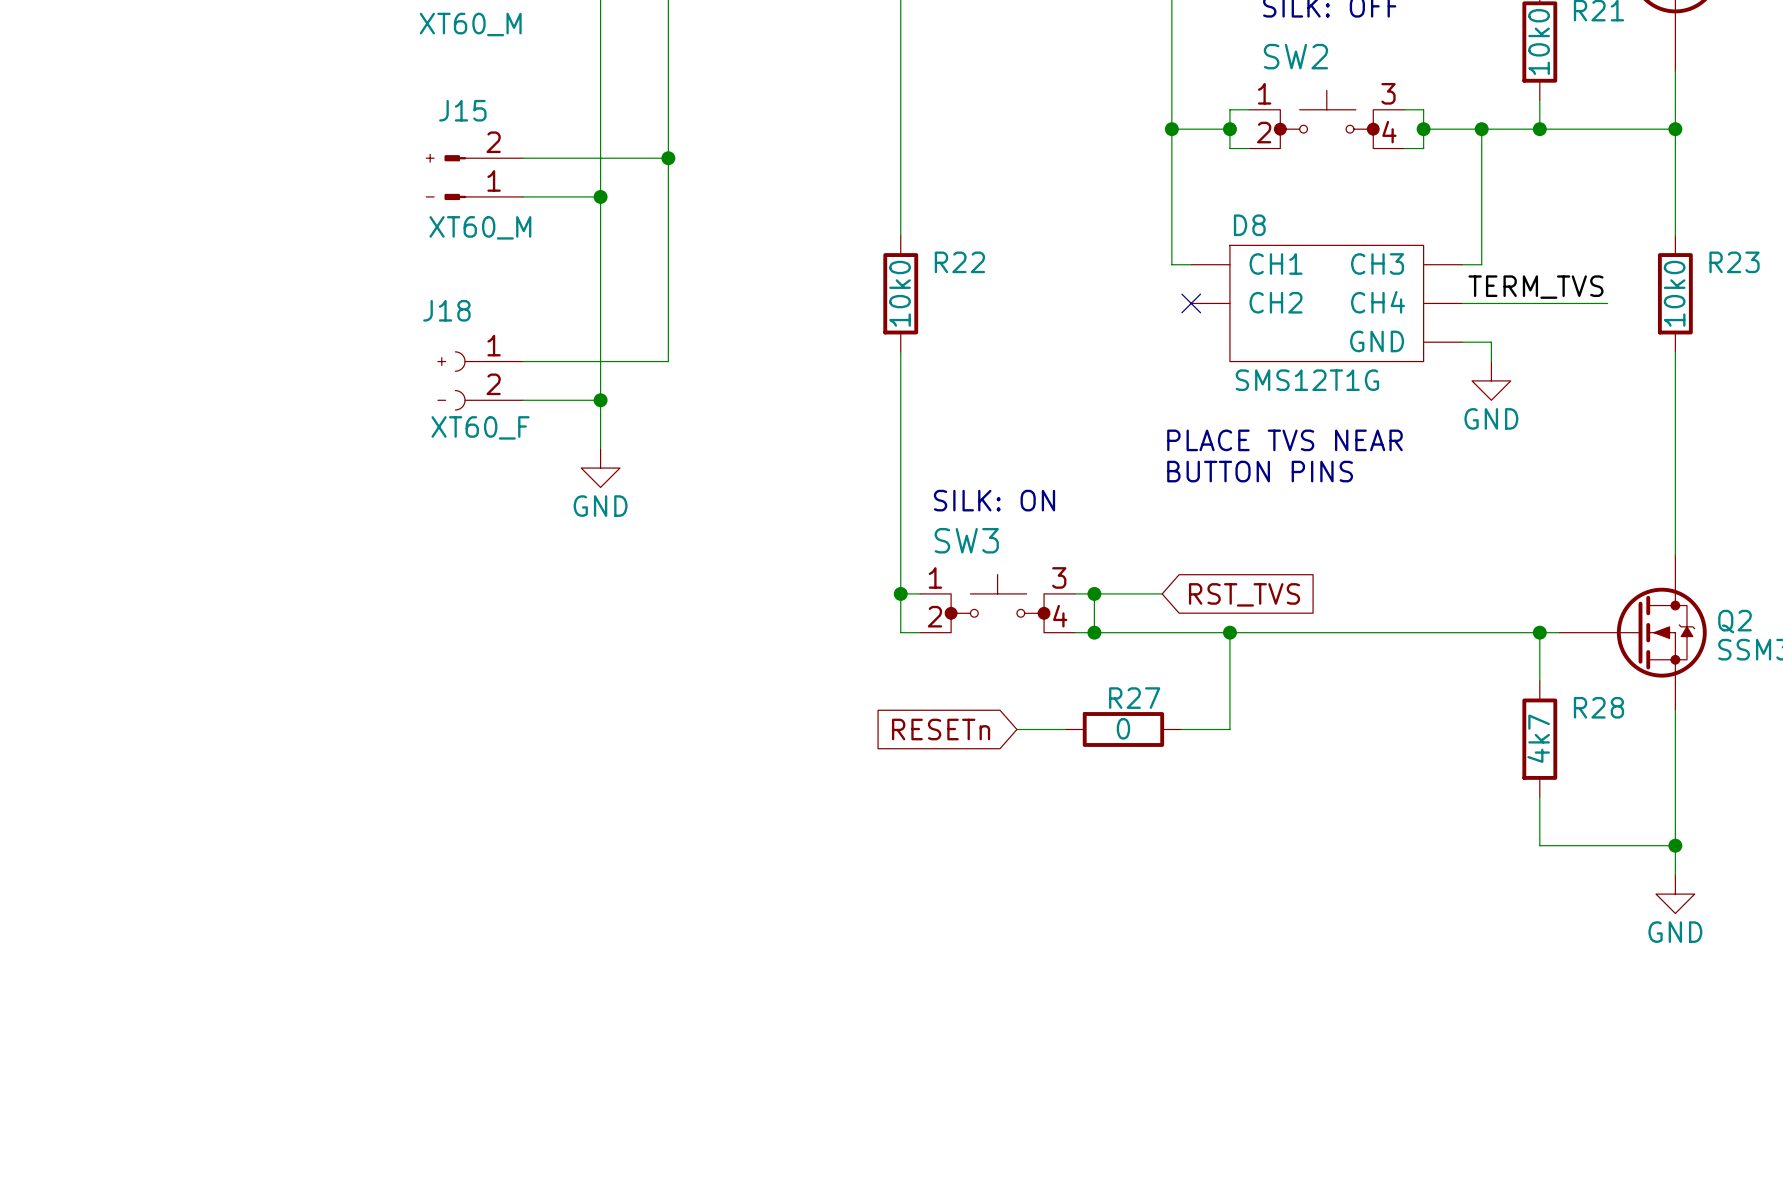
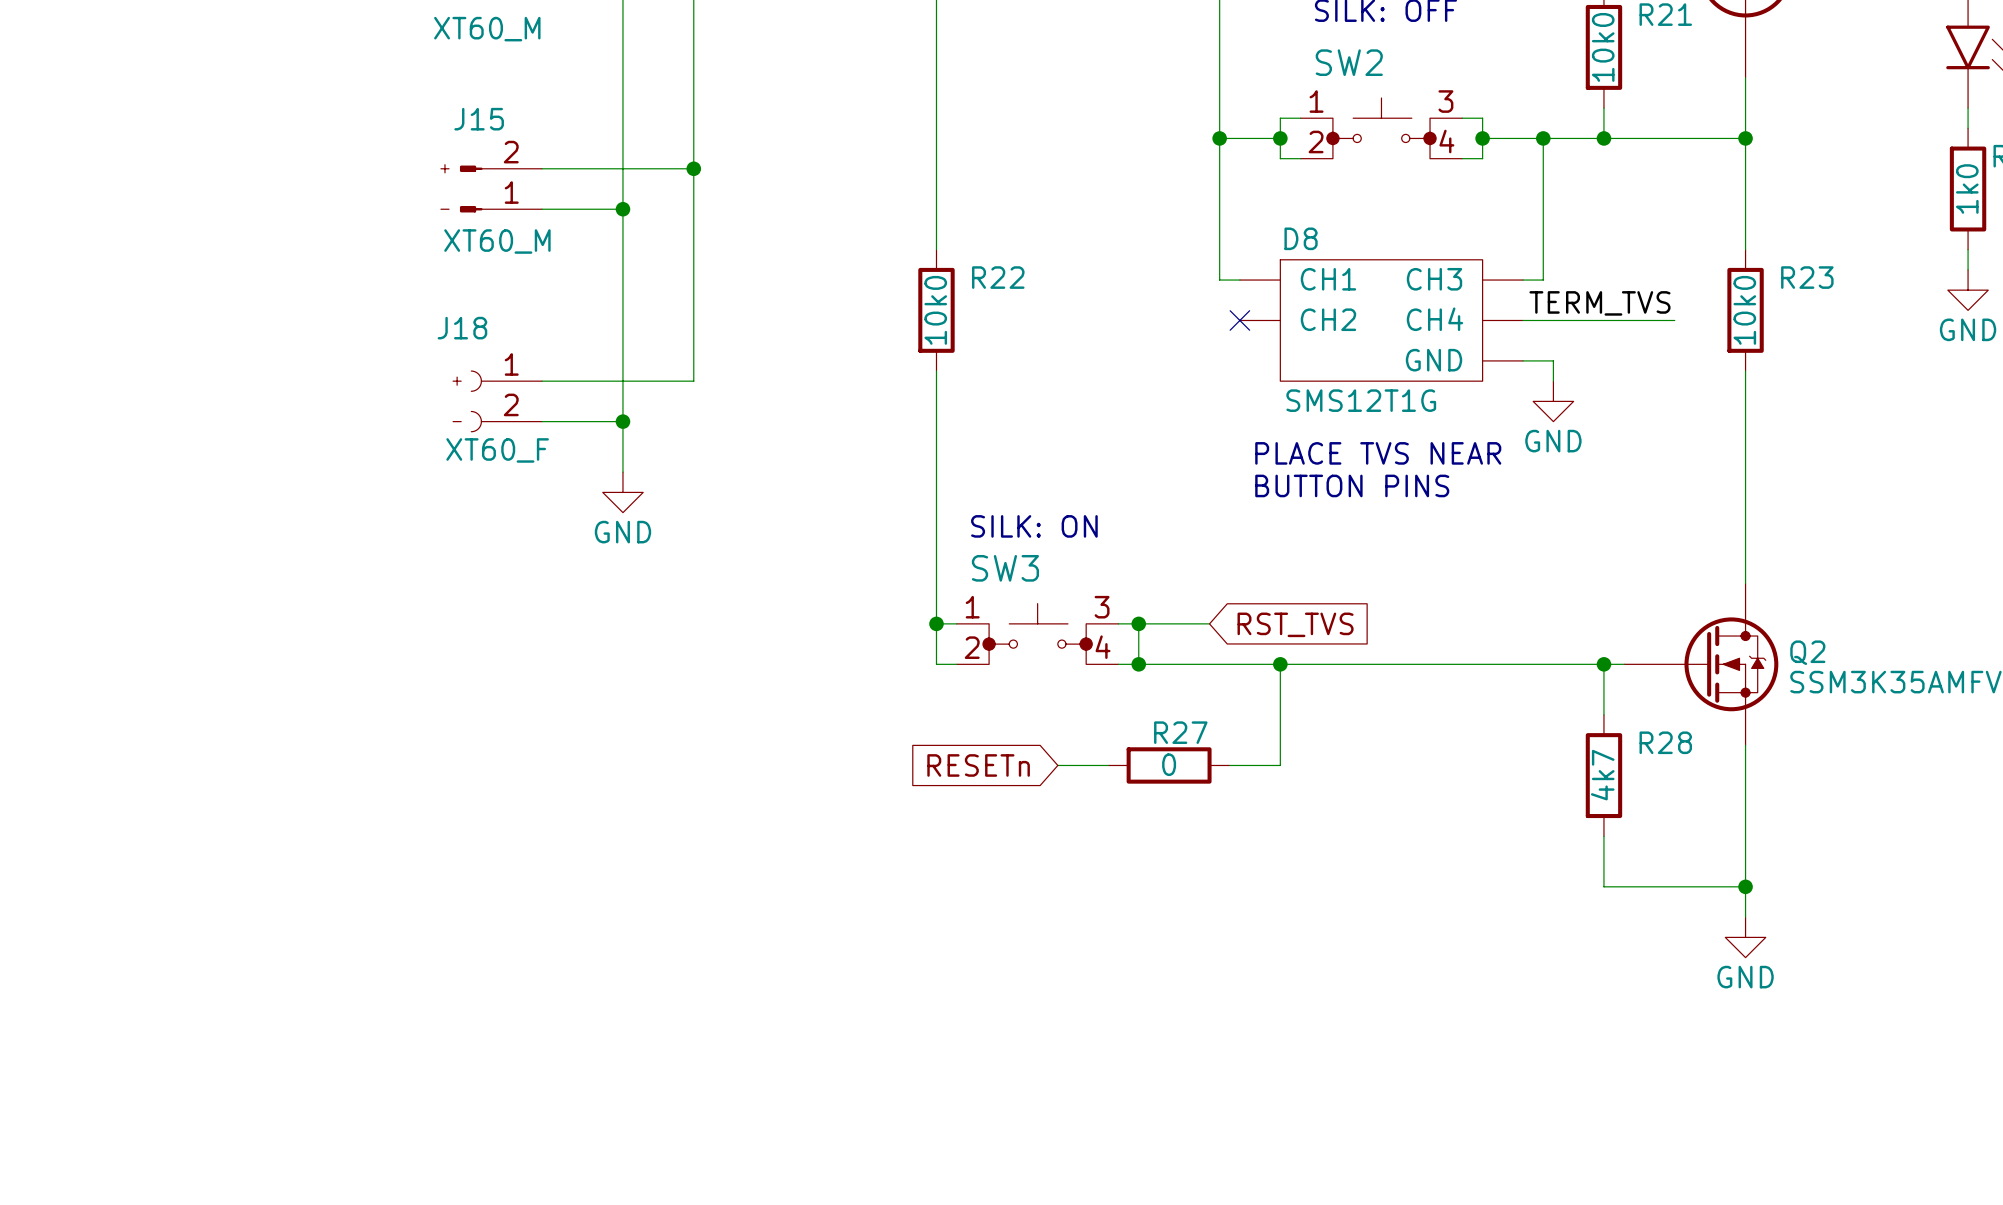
text position: PLACE TVS NEAR (1284, 440) -> PLACE TVS NEAR (1378, 453)
text position: BUTTON PINS (1260, 471) -> BUTTON PINS (1352, 485)

